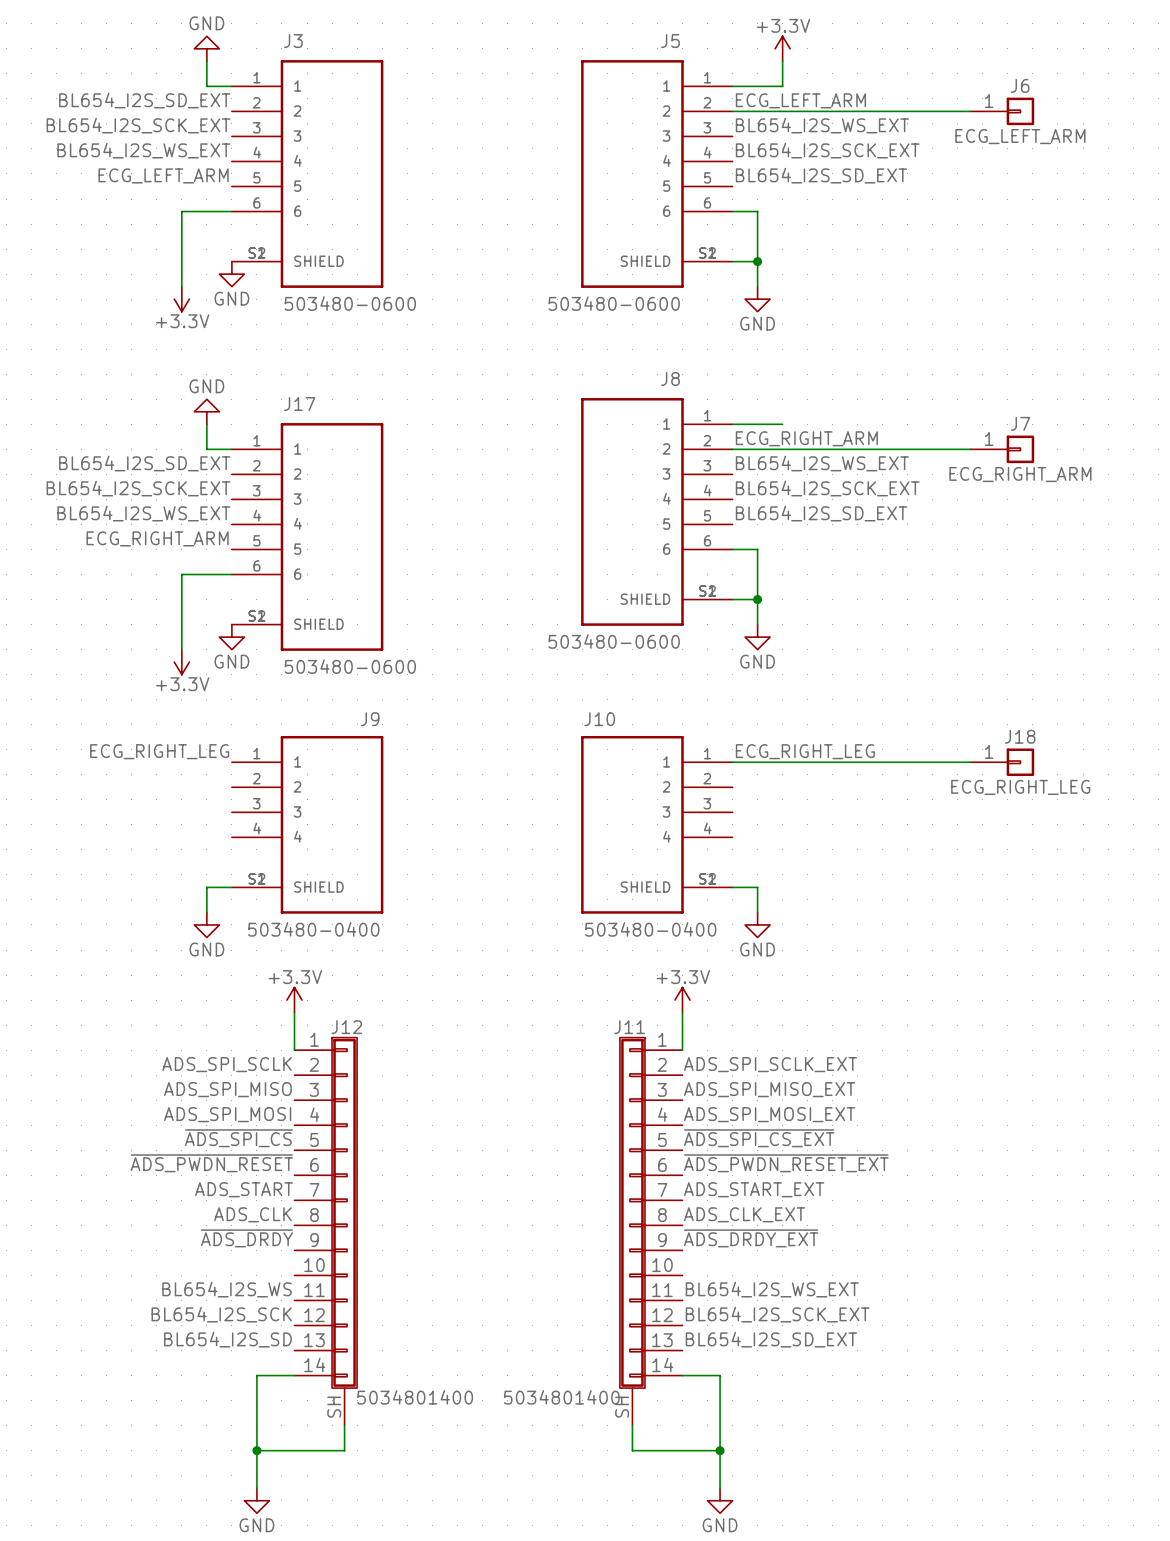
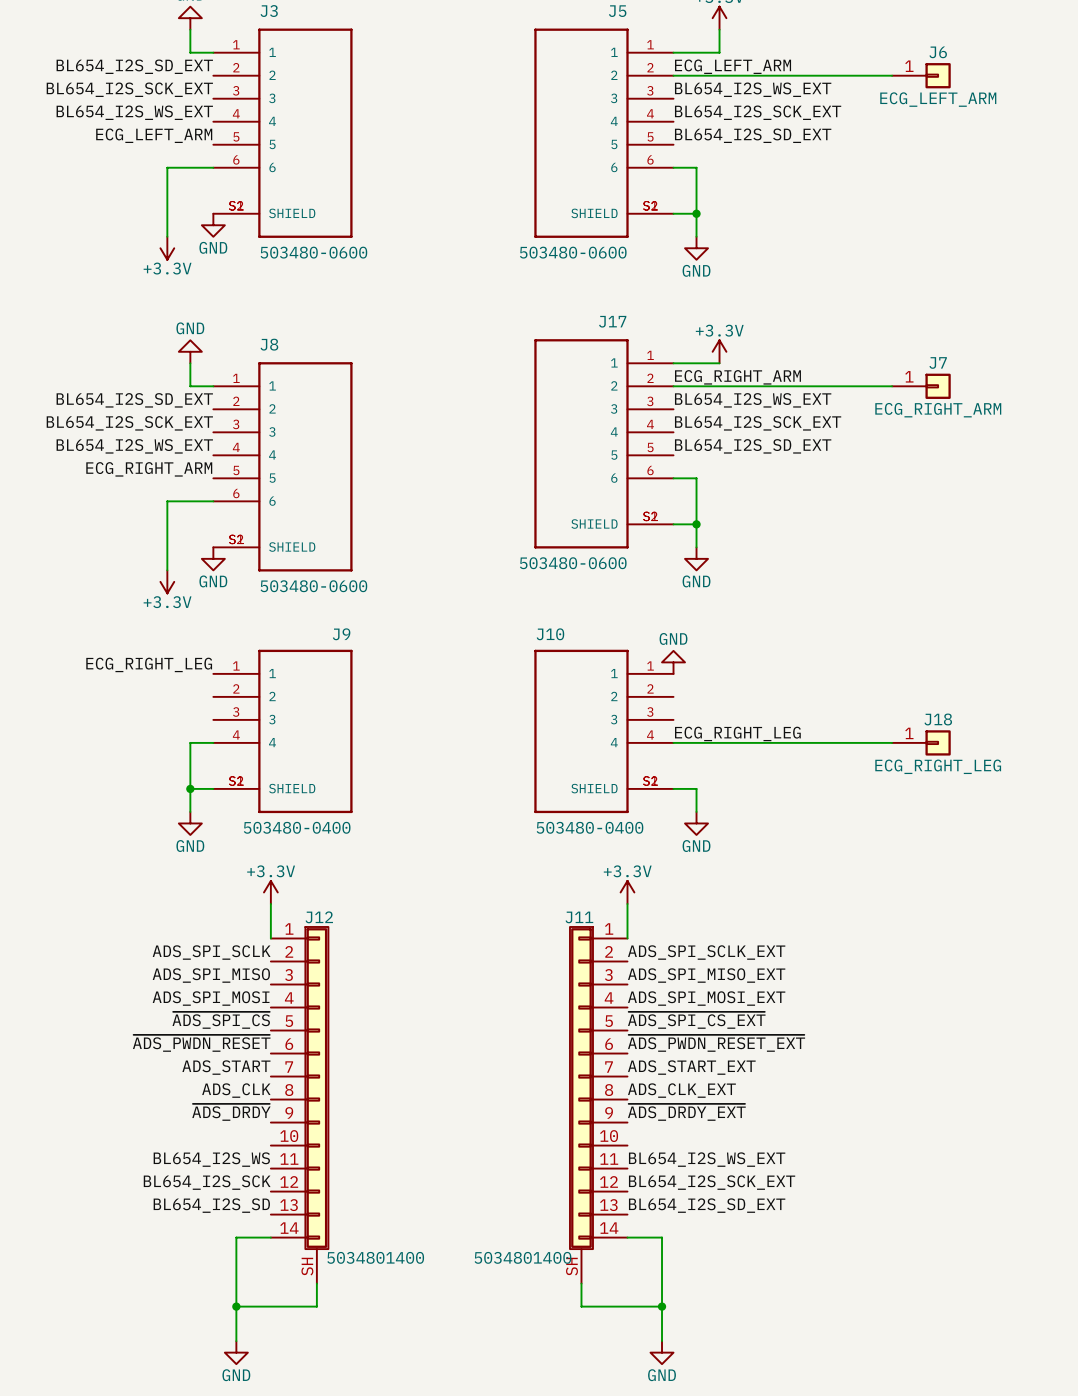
J8 name: J8 (670, 378) -> J17 (612, 321)
J17 name: J17 (299, 404) -> J8 (269, 344)
power symbol: none -> +3.3V (719, 351)
power symbol: none -> GND (673, 662)
label position: ECG_RIGHT_LEG (805, 751) -> ECG_RIGHT_LEG (737, 733)
wire: (732, 762) (970, 762) -> (673, 742) (892, 742)
J18 position: (1002, 762) -> (921, 742)
wire: none -> (213, 742) (190, 742) (190, 788)
junction: none -> (190, 788)

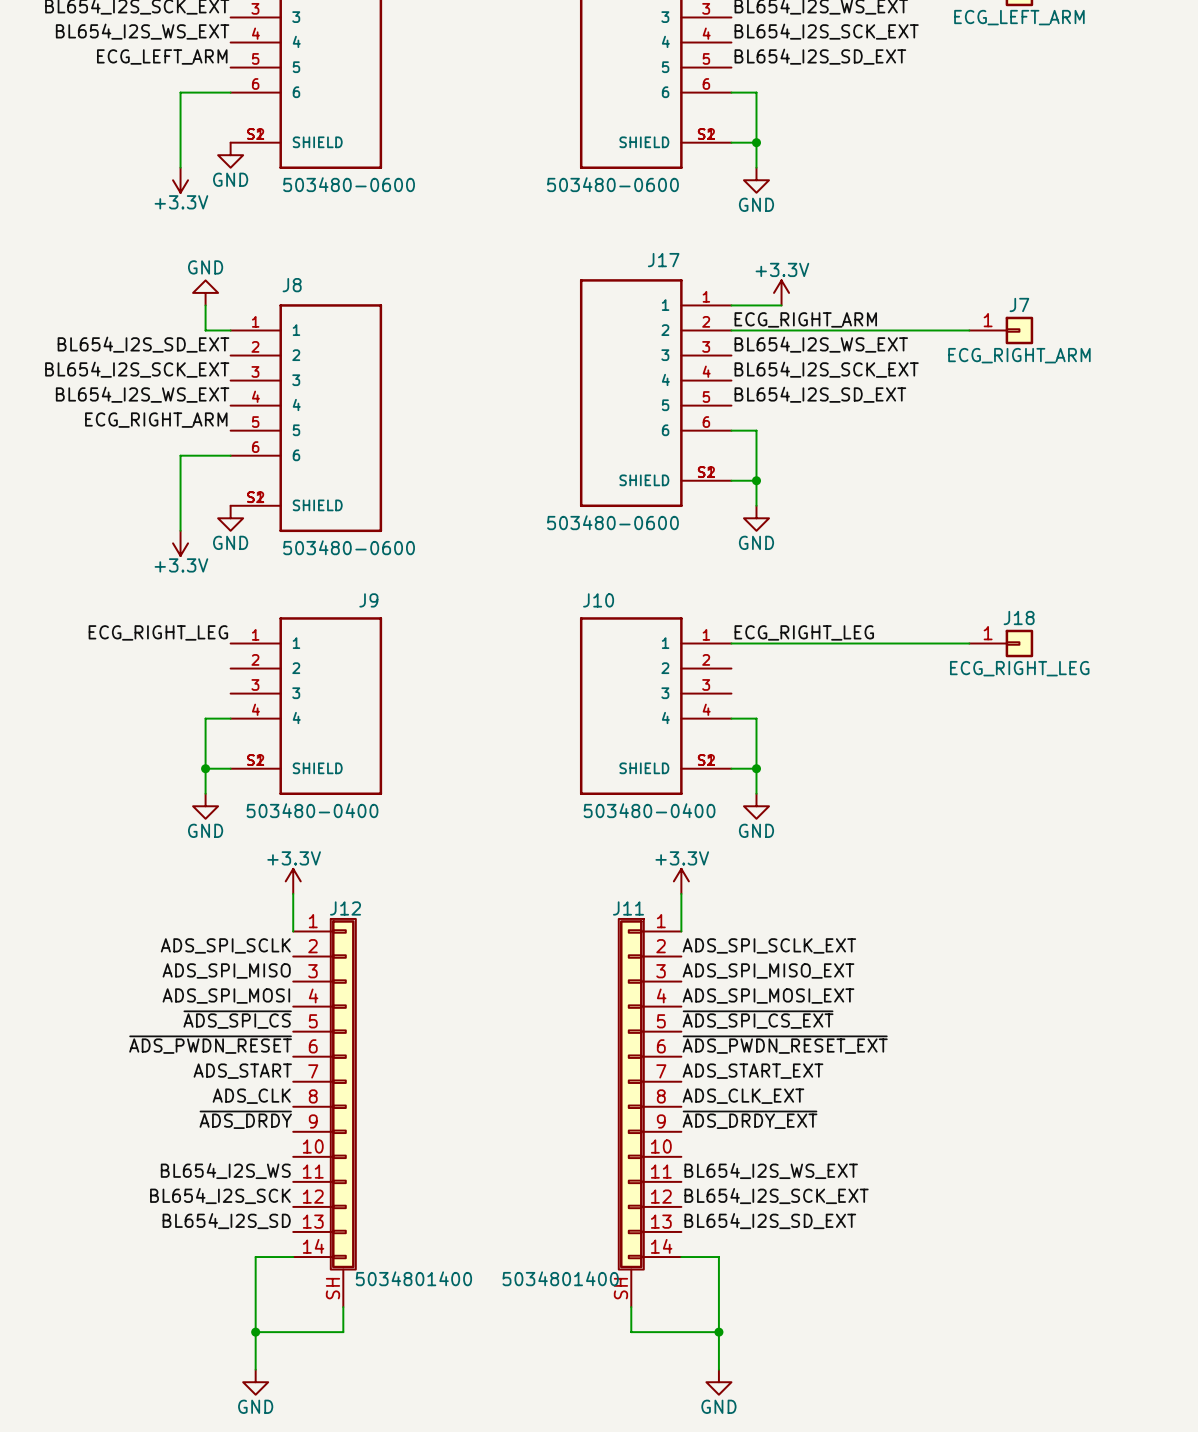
power symbol: GND (673, 662) -> none
wire: none -> (731, 643) (969, 643)
label position: ECG_RIGHT_LEG (737, 733) -> ECG_RIGHT_LEG (804, 632)
wire: (696, 742) (892, 742) -> (756, 718) (756, 768)
J18 position: (921, 742) -> (1001, 643)
junction: none -> (756, 768)

